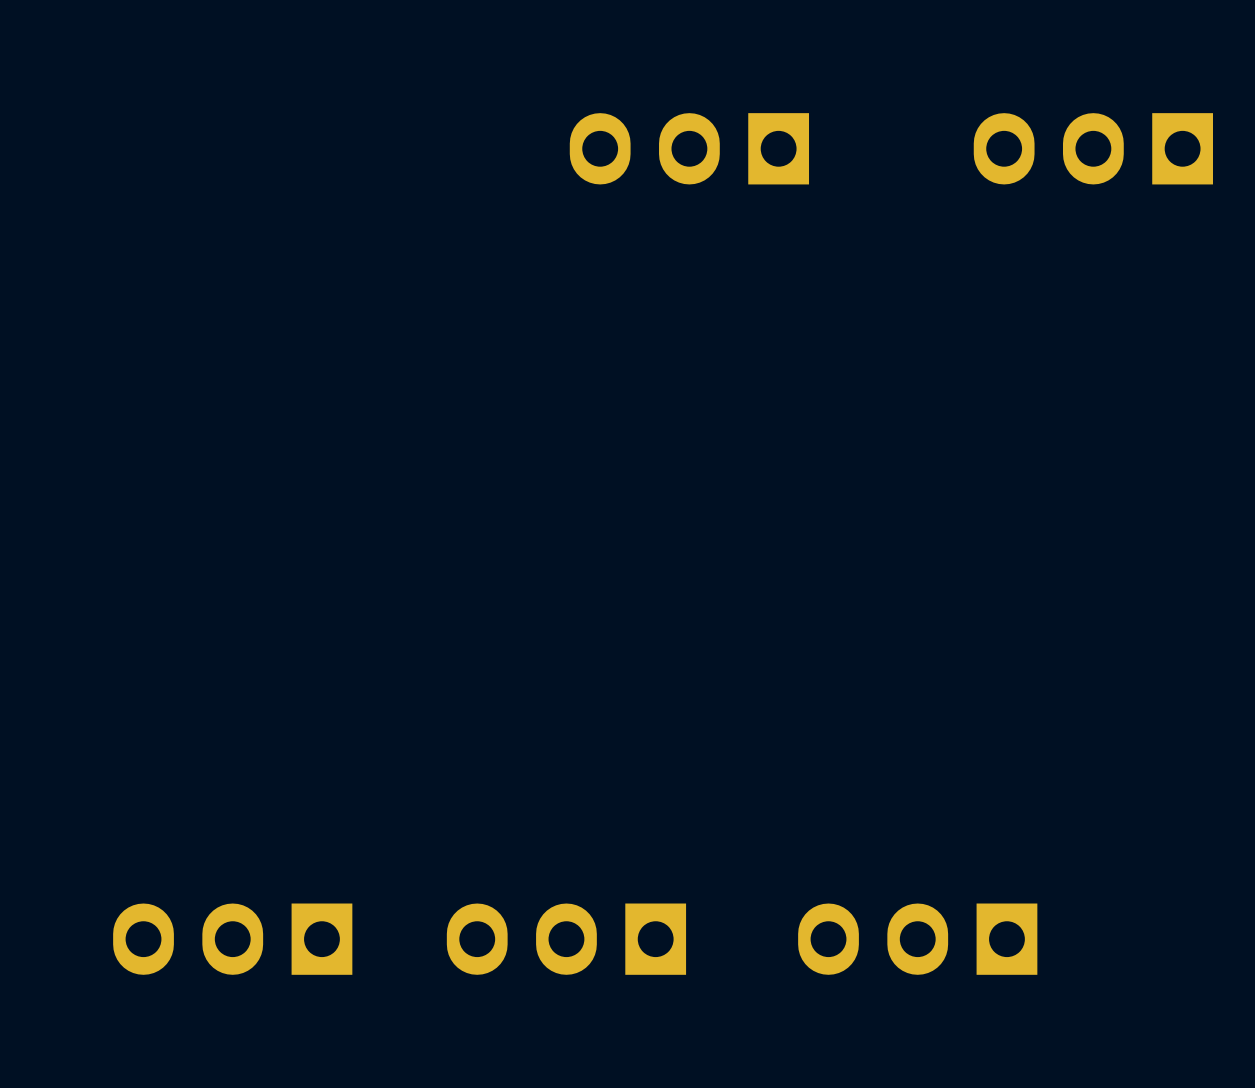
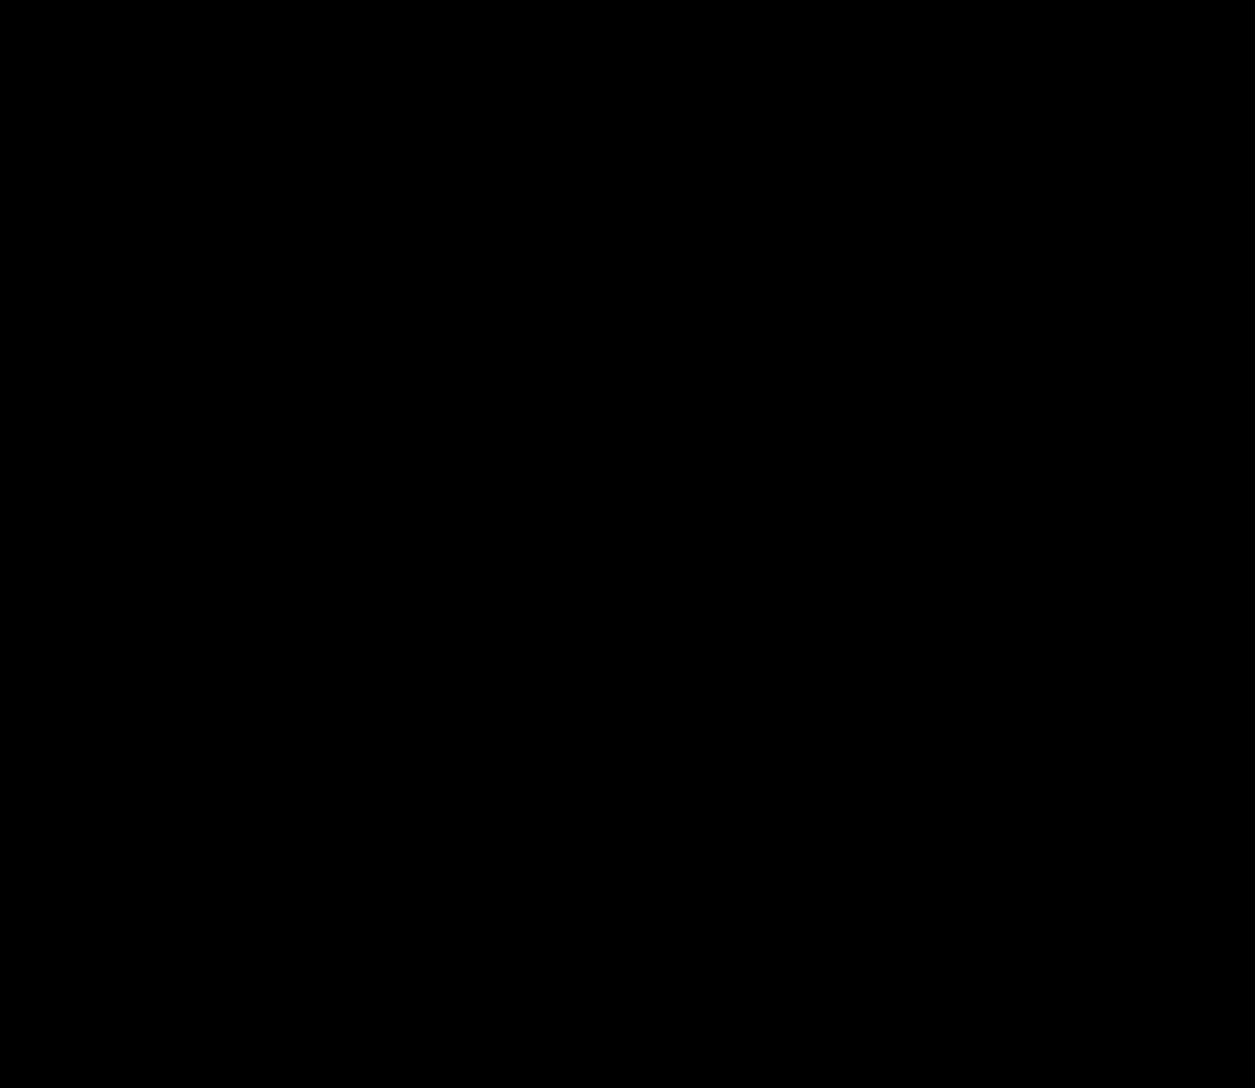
part: (689, 148) -> none
part: (1093, 148) -> none
part: (232, 939) -> none
part: (566, 939) -> none
part: (917, 939) -> none

